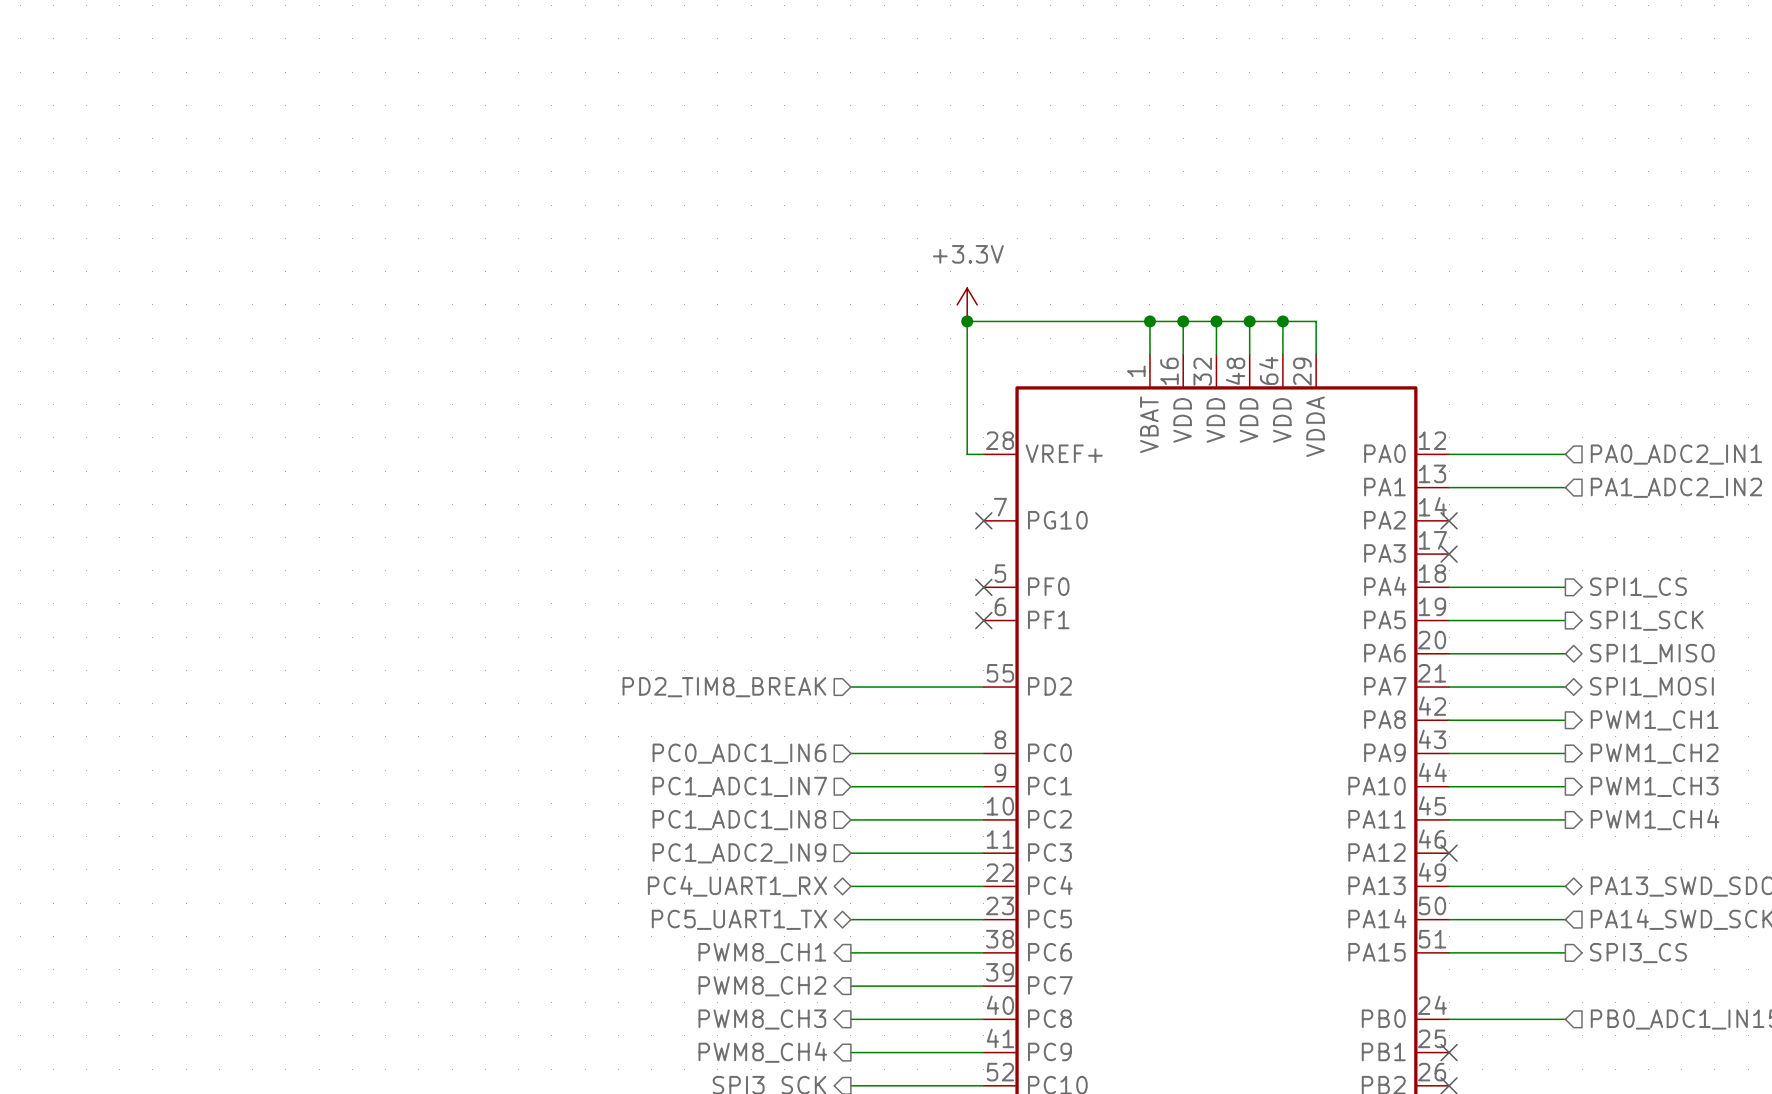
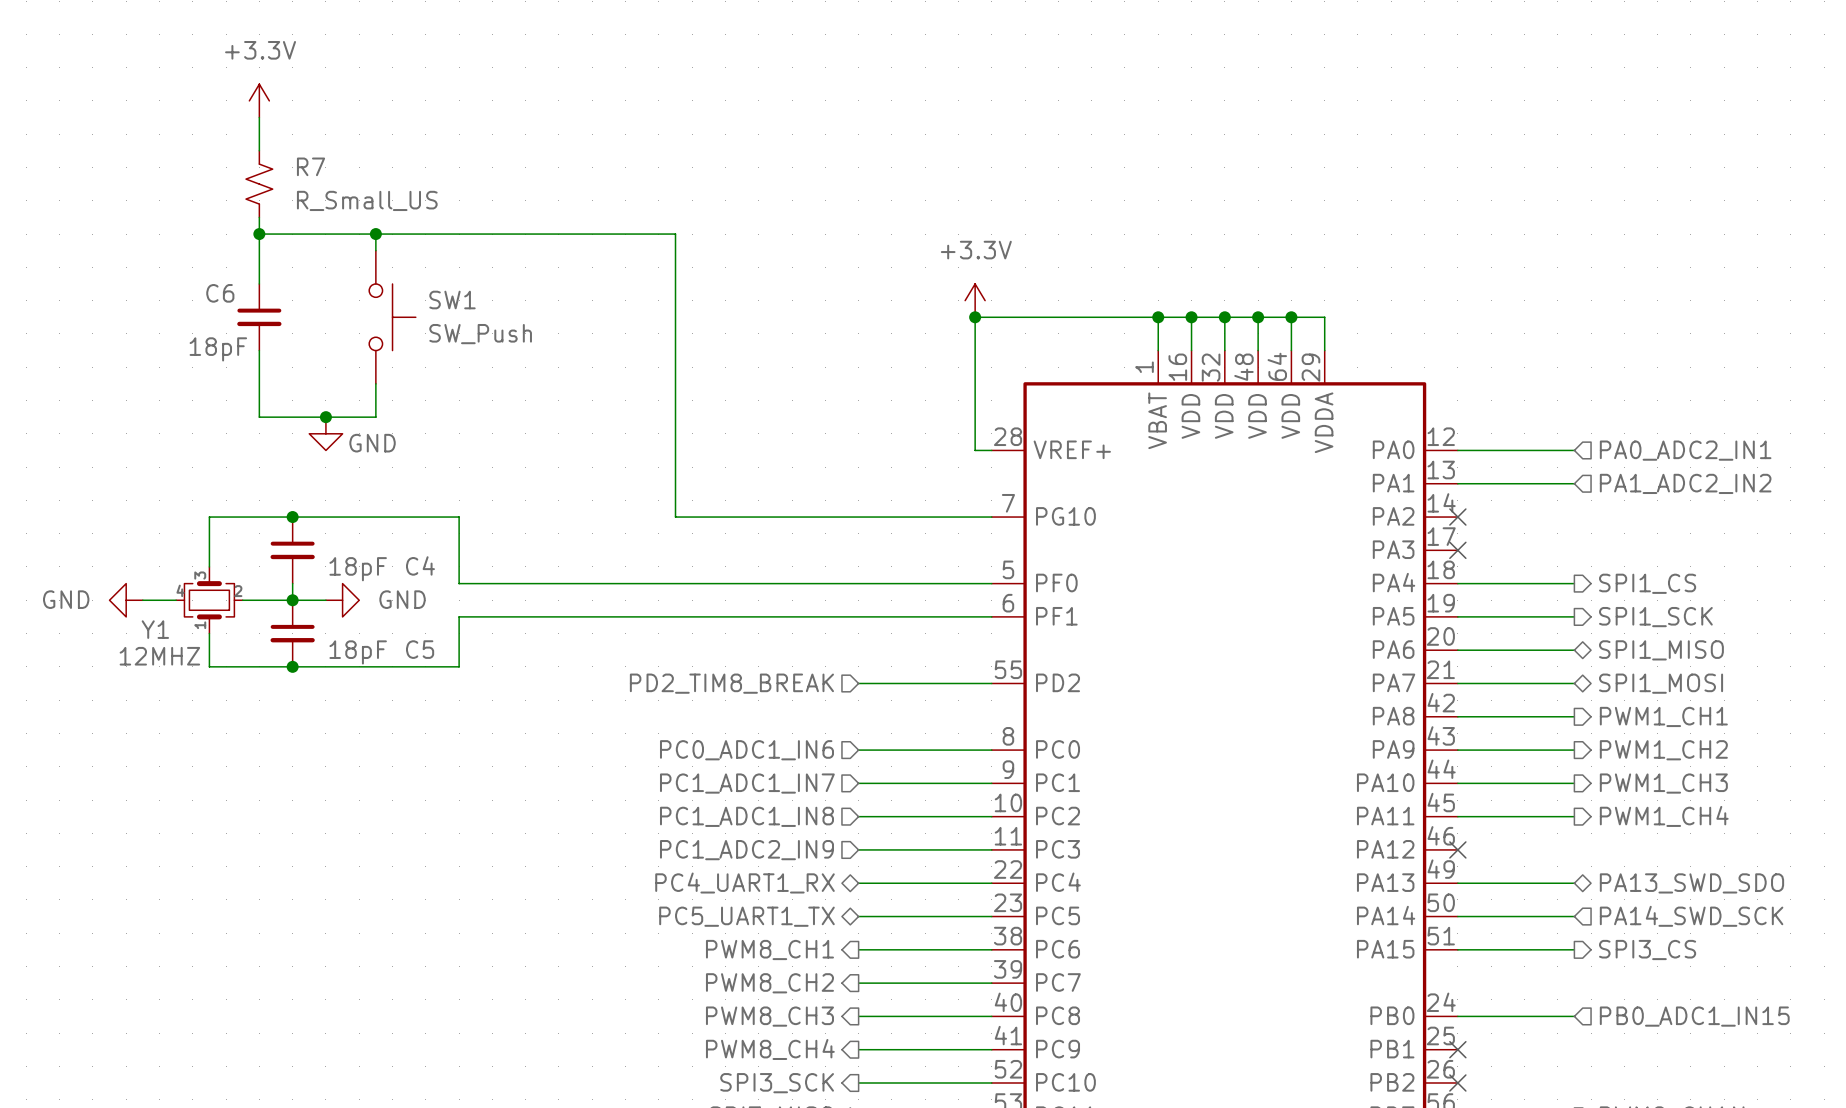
power symbol: none -> +3.3V (259, 100)
wire: none -> (259, 117) (259, 150)
R7: none -> R_Small_US (259, 184)
wire: none -> (259, 217) (259, 283)
wire: none -> (259, 234) (675, 234) (675, 517) (991, 517)
junction: none -> (259, 234)
wire: none -> (375, 234) (375, 250)
junction: none -> (375, 234)
C6: none -> 18pF (259, 317)
SW1: none -> SW_Push (392, 317)
wire: none -> (259, 350) (259, 417) (375, 417) (375, 383)
junction: none -> (325, 417)
power symbol: none -> GND (325, 433)
junction: none -> (292, 517)
no-connect mark: (983, 520) -> none
C4: none -> 18pF (292, 550)
wire: none -> (209, 566) (209, 517) (459, 517) (459, 583) (991, 583)
wire: none -> (292, 583) (292, 600)
no-connect mark: (983, 587) -> none
power symbol: none -> GND (126, 600)
wire: none -> (142, 600) (176, 600)
Y1: none -> 12MHZ (209, 600)
wire: none -> (242, 600) (325, 600)
junction: none -> (292, 600)
power symbol: none -> GND (342, 600)
wire: none -> (991, 616) (459, 616) (459, 666) (209, 666) (209, 633)
no-connect mark: (983, 620) -> none
C5: none -> 18pF (292, 633)
junction: none -> (292, 666)

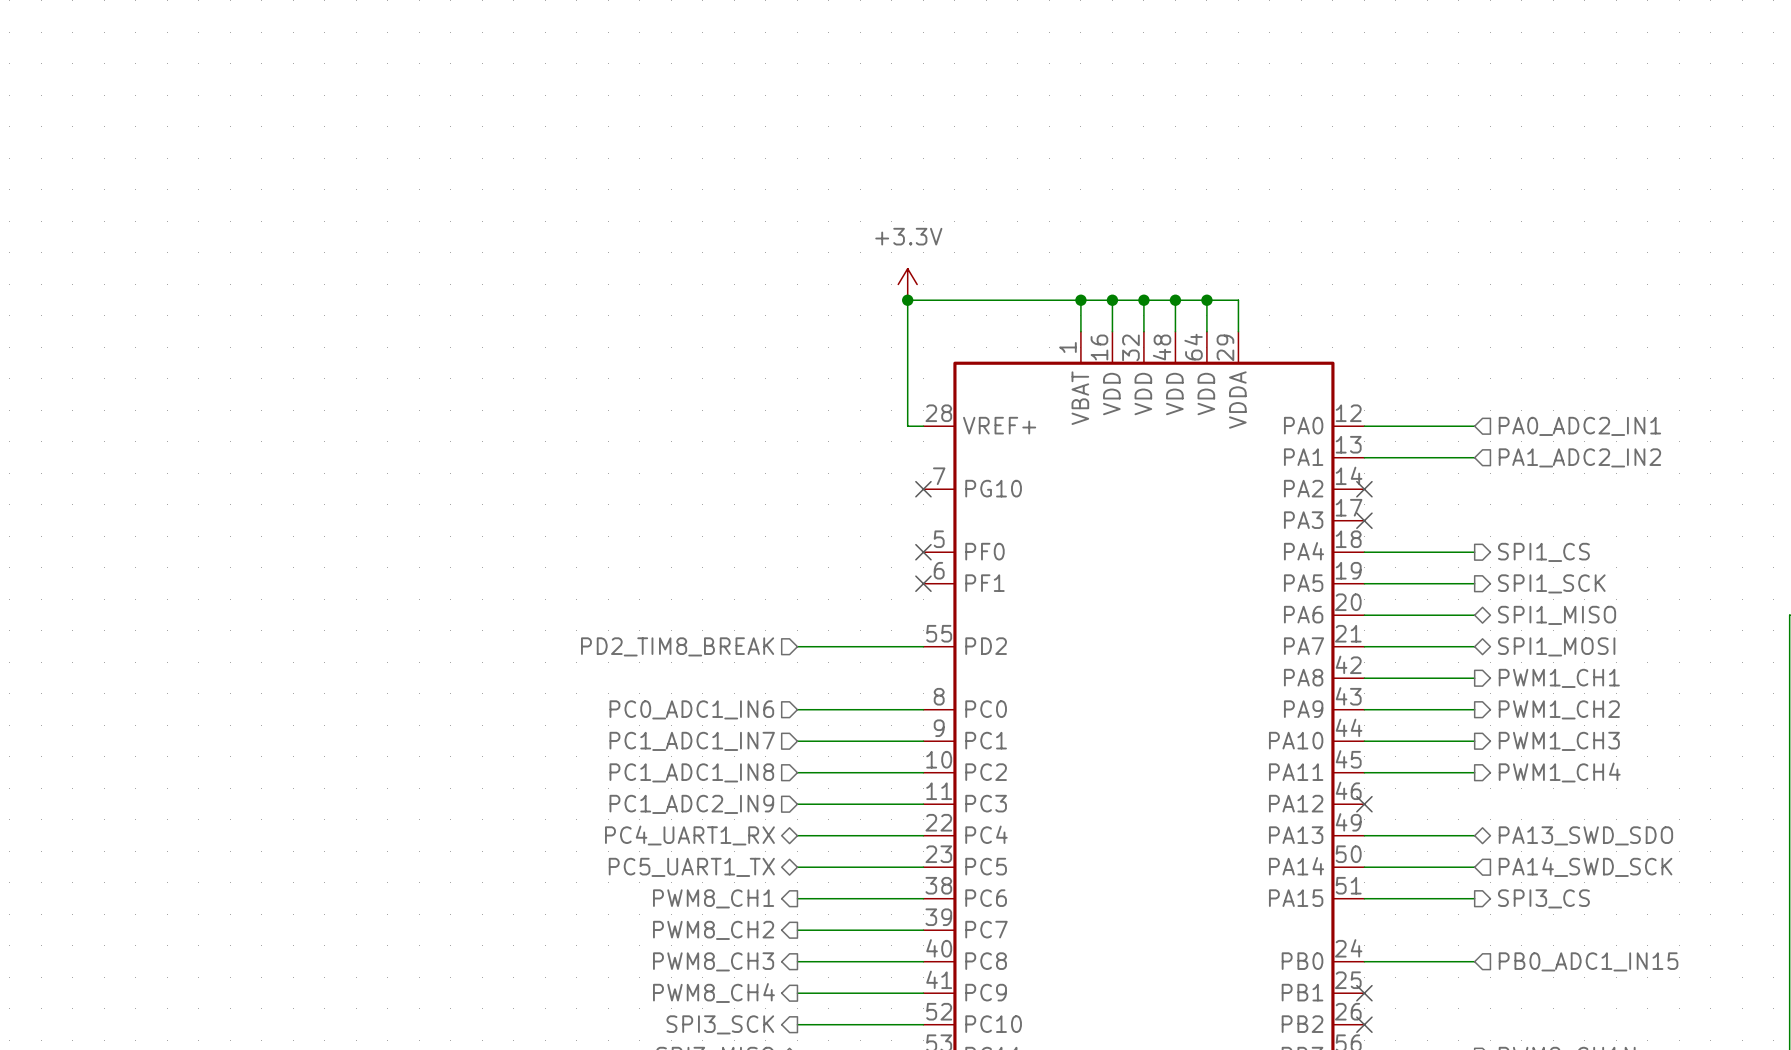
power symbol: +3.3V (259, 100) -> none
wire: (259, 117) (259, 150) -> none
R7: R_Small_US (259, 184) -> none
wire: (259, 217) (259, 283) -> none
wire: (259, 234) (675, 234) (675, 517) (991, 517) -> none
junction: (259, 234) -> none
wire: (375, 234) (375, 250) -> none
junction: (375, 234) -> none
C6: 18pF (259, 317) -> none
SW1: SW_Push (392, 317) -> none
wire: (259, 350) (259, 417) (375, 417) (375, 383) -> none
junction: (325, 417) -> none
power symbol: GND (325, 433) -> none
junction: (292, 517) -> none
no-connect mark: none -> (923, 489)
C4: 18pF (292, 550) -> none
wire: (209, 566) (209, 517) (459, 517) (459, 583) (991, 583) -> none
wire: (292, 583) (292, 600) -> none
no-connect mark: none -> (923, 552)
power symbol: GND (126, 600) -> none
wire: (142, 600) (176, 600) -> none
Y1: 12MHZ (209, 600) -> none
wire: (242, 600) (325, 600) -> none
junction: (292, 600) -> none
power symbol: GND (342, 600) -> none
wire: (991, 616) (459, 616) (459, 666) (209, 666) (209, 633) -> none
no-connect mark: none -> (923, 583)
C5: 18pF (292, 633) -> none
junction: (292, 666) -> none

